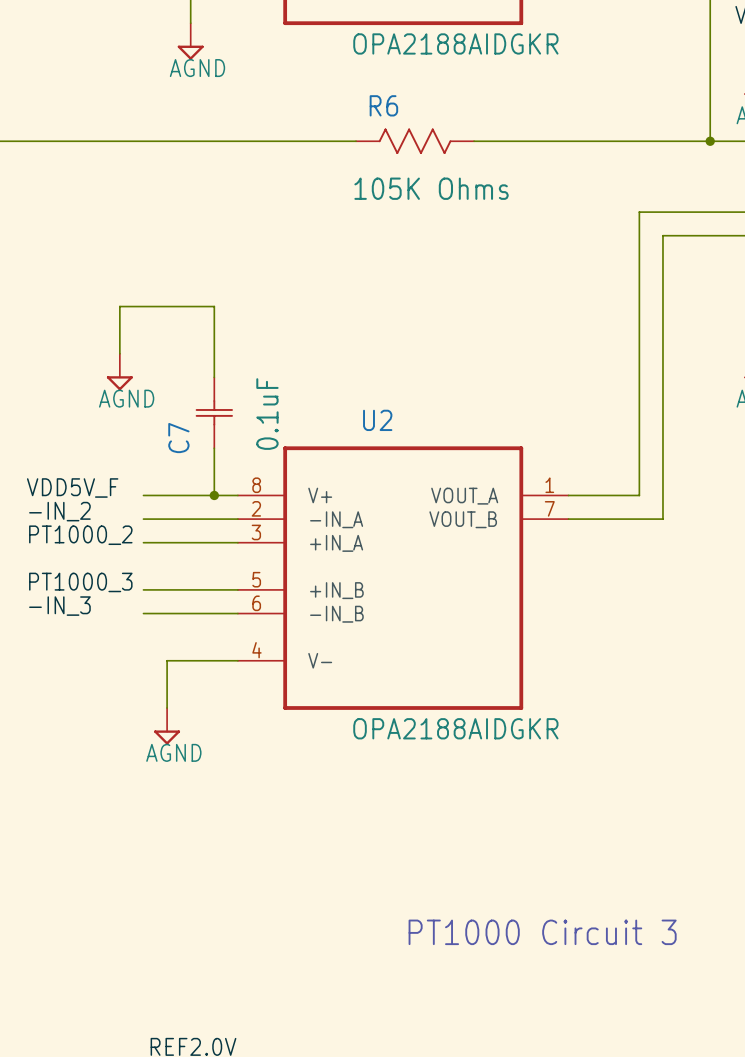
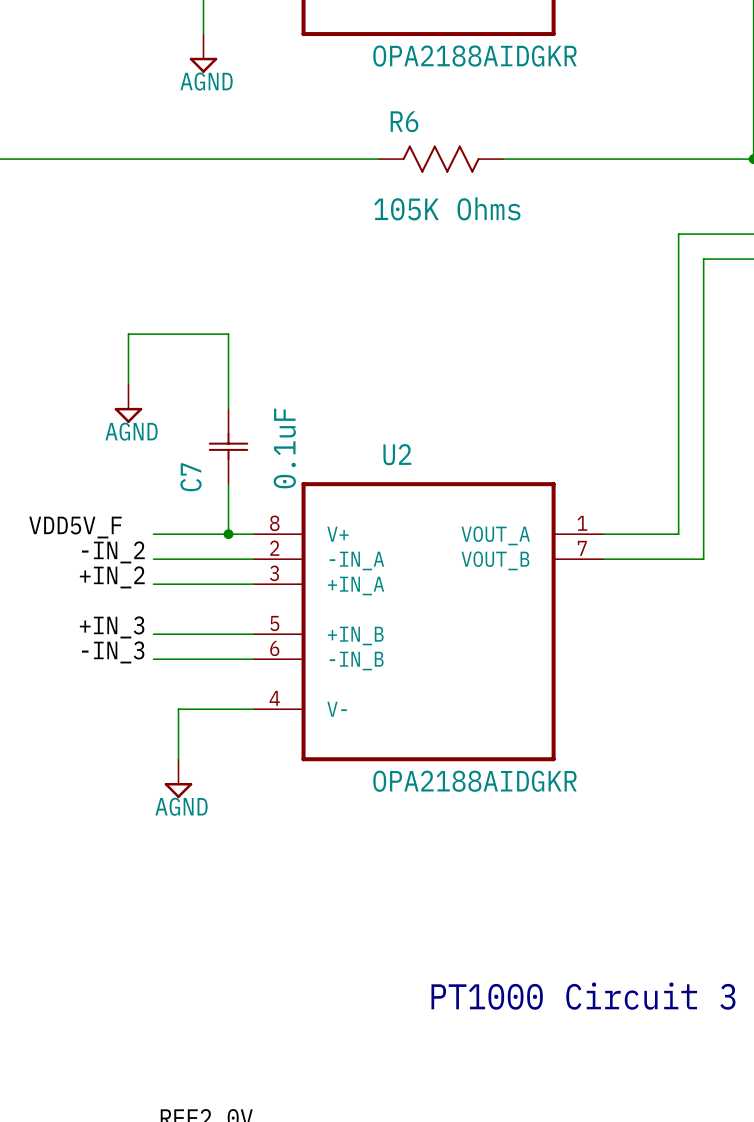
label position: -IN_2 (59, 511) -> -IN_2 (113, 552)
label: PT1000_2 (80, 535) -> none
label: none -> +IN_2 (112, 577)
label: PT1000_3 (80, 582) -> none
label: none -> +IN_3 (112, 627)
label position: -IN_3 (59, 606) -> -IN_3 (113, 652)

